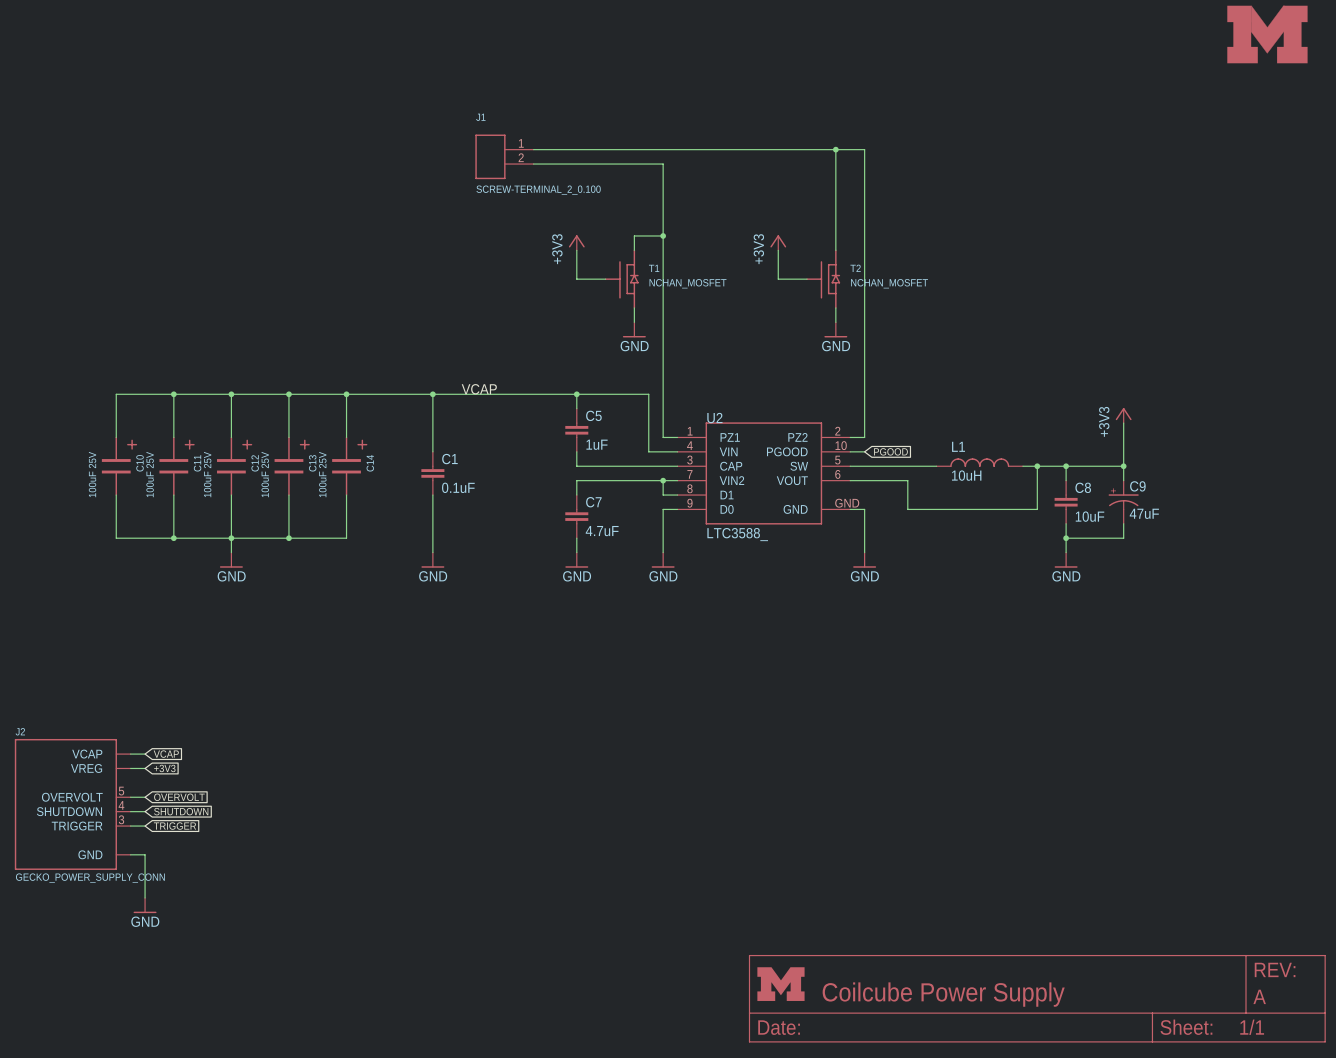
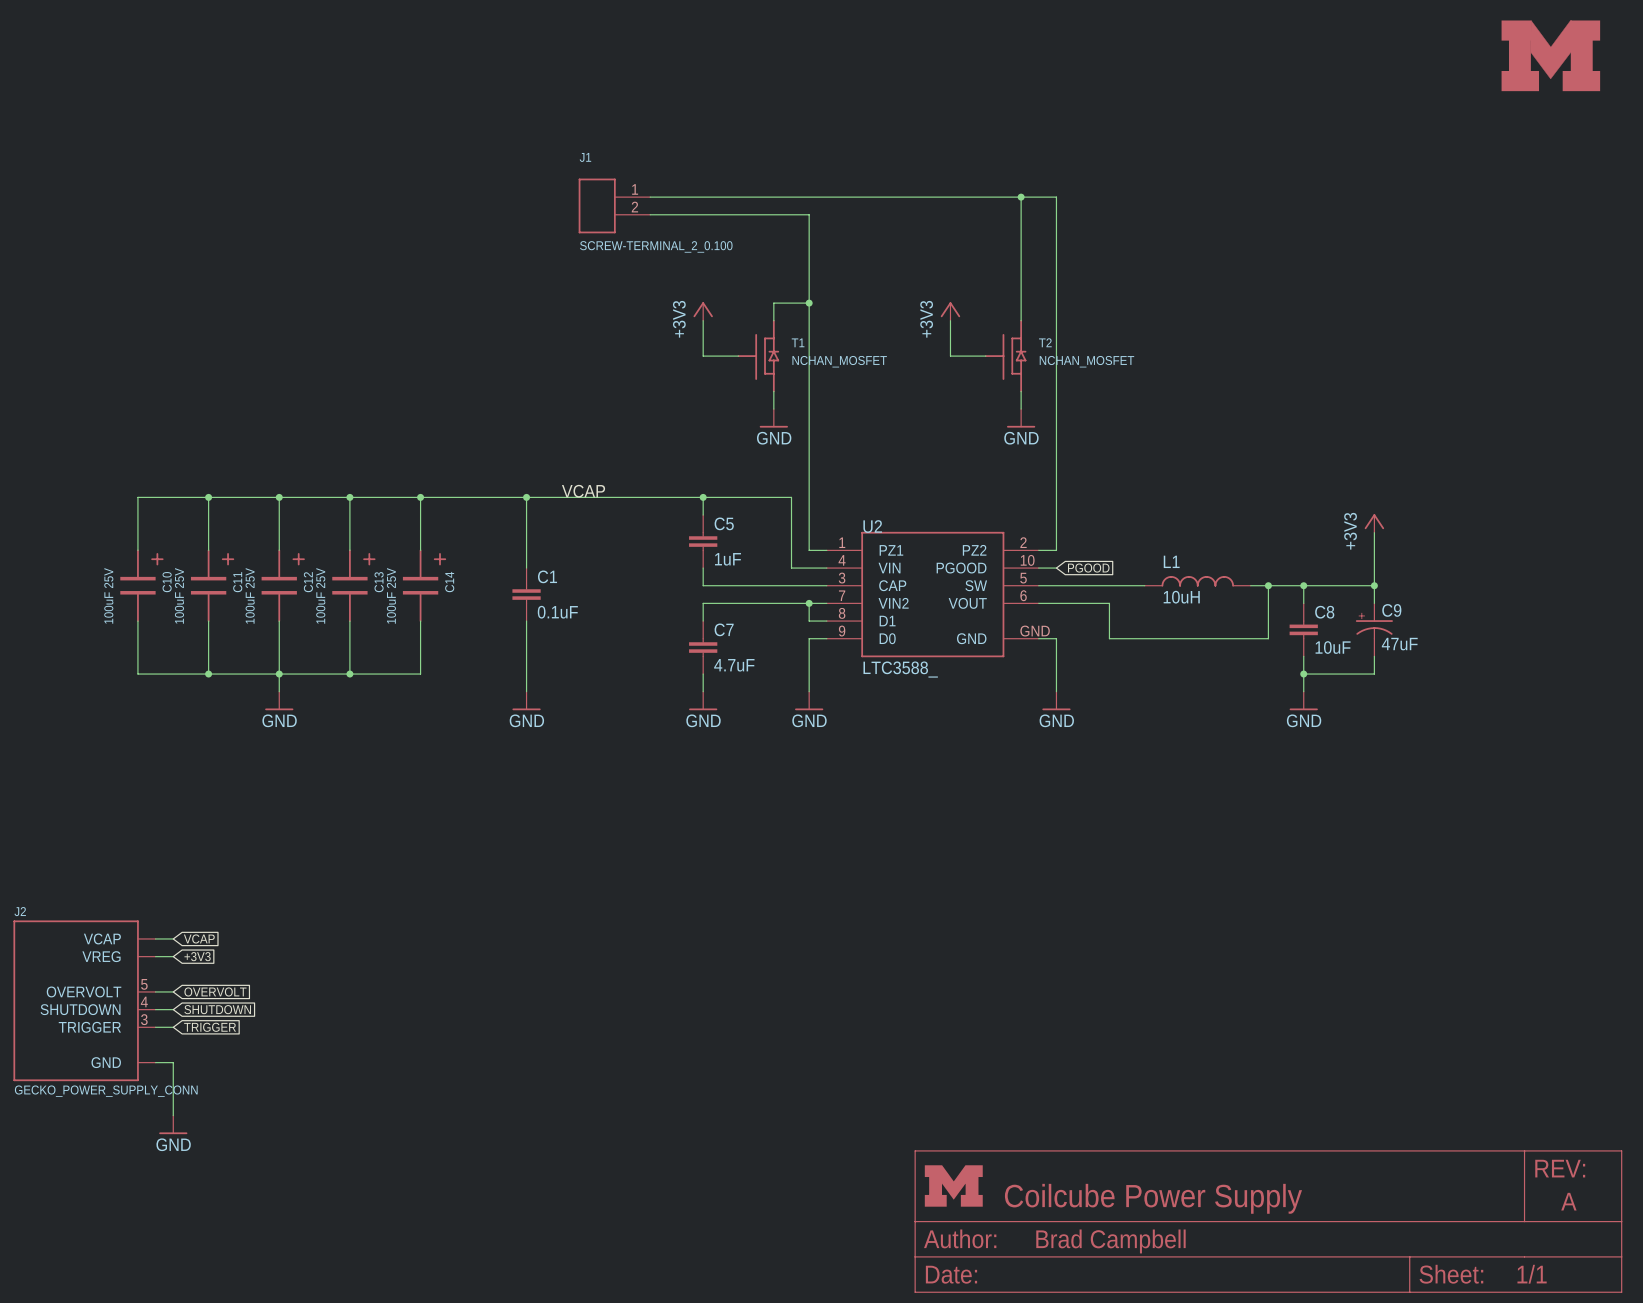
part: none -> (1268, 1221)
part: (1037, 998) -> none

